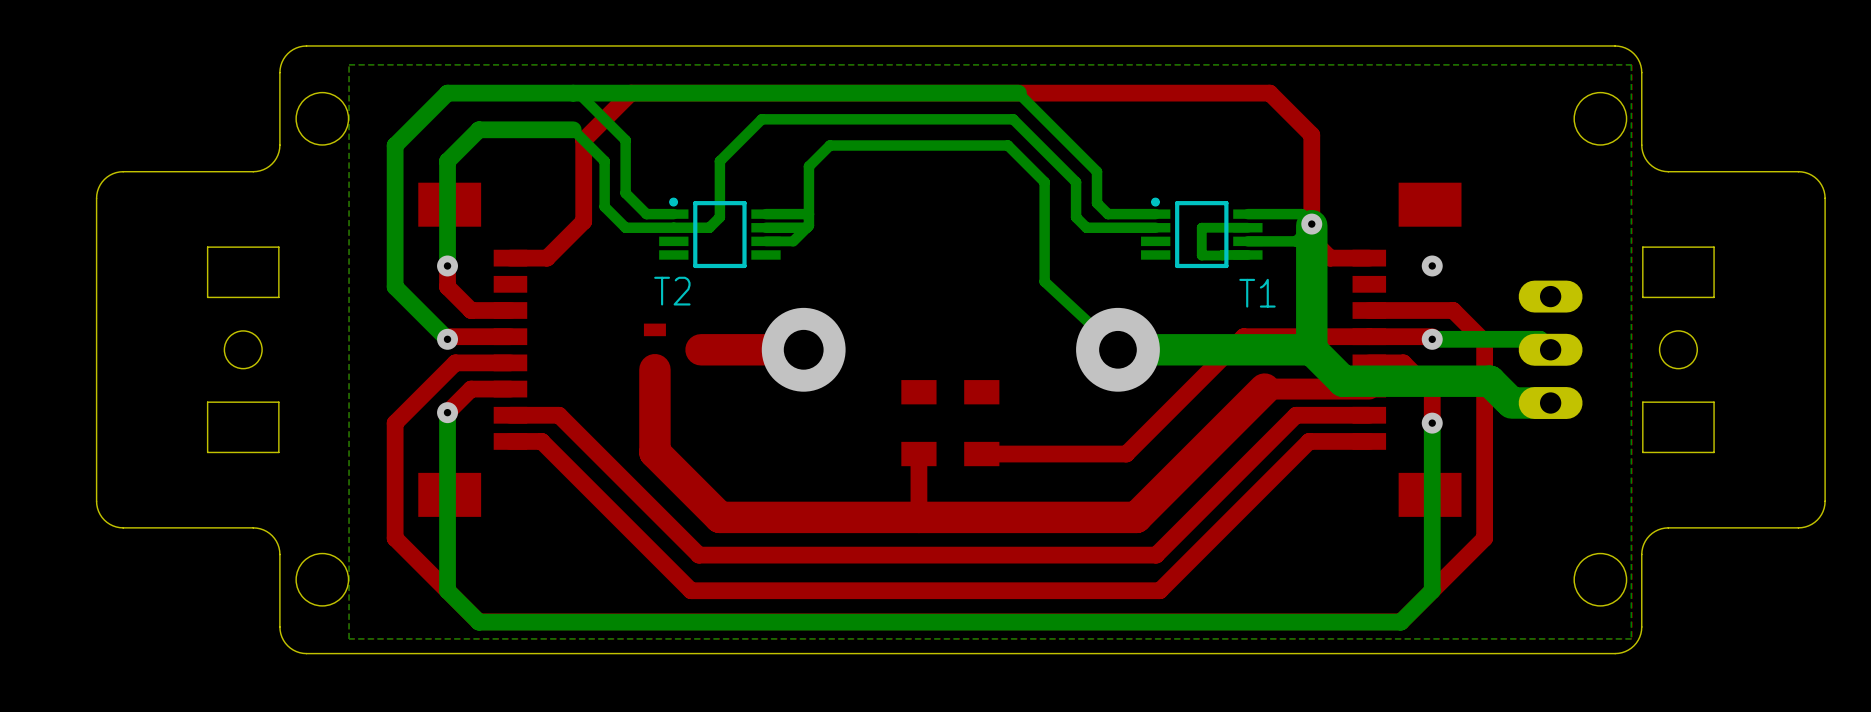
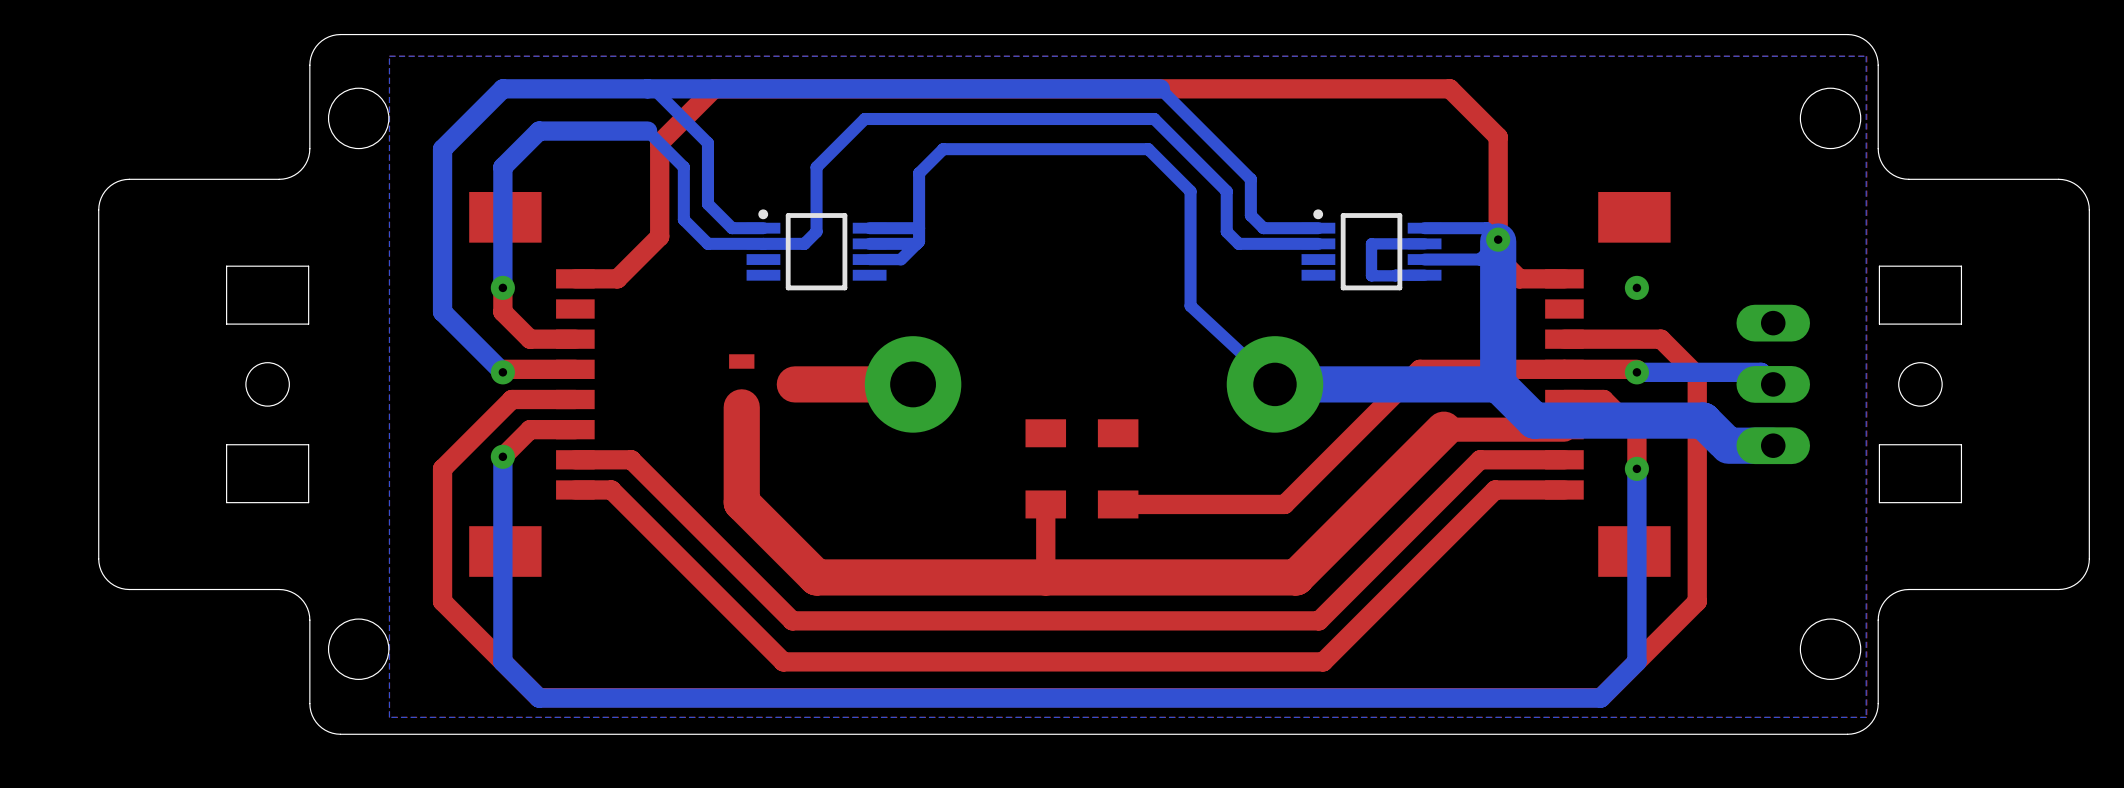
T2 name: T2 (672, 291) -> none
T1 name: T1 (1257, 293) -> none

